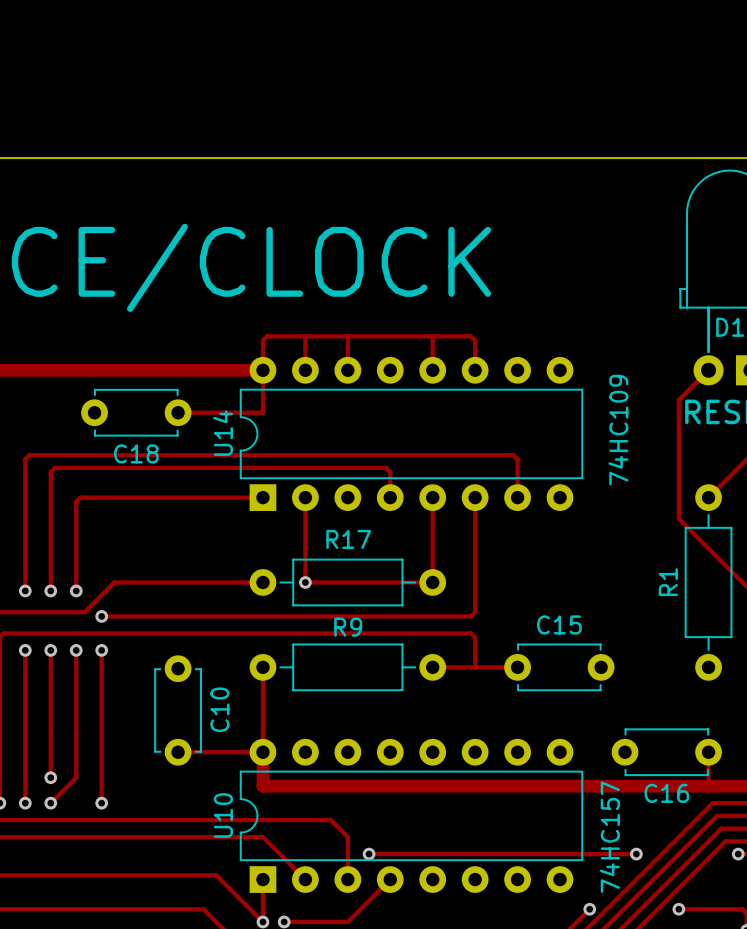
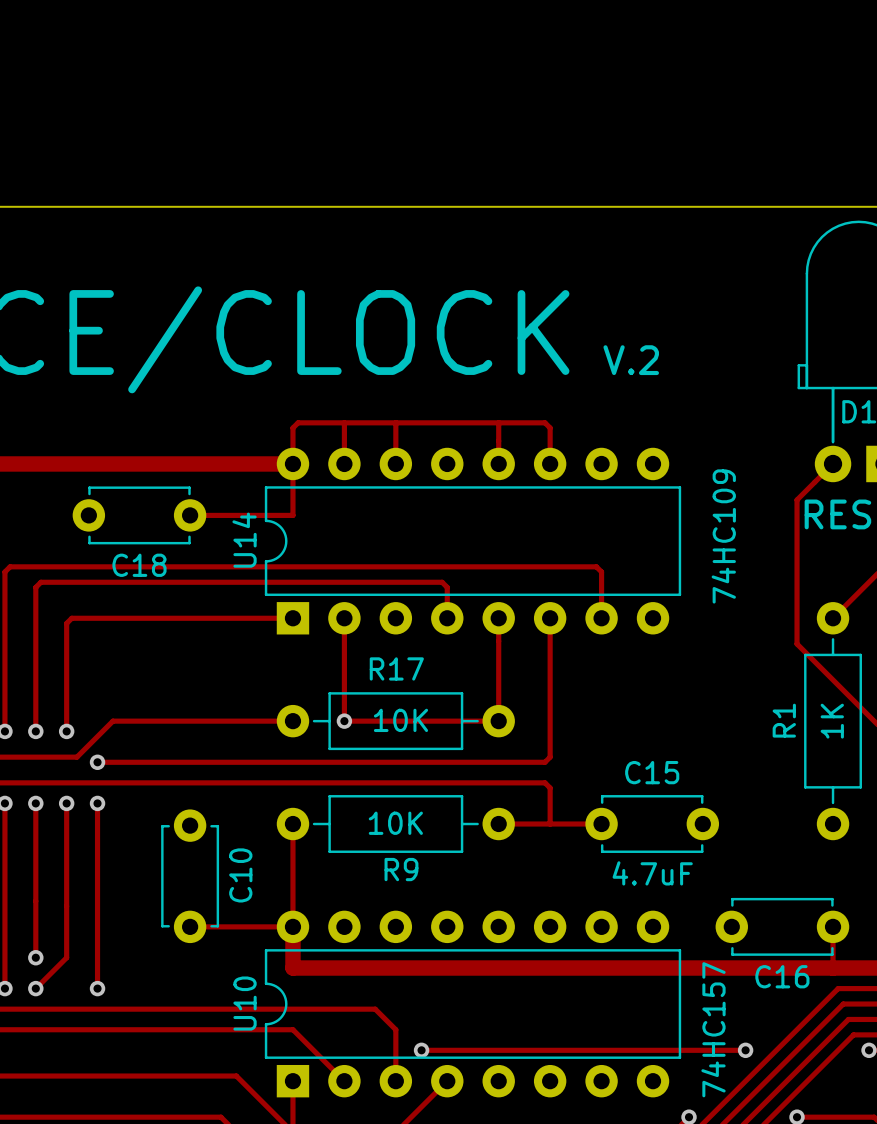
text: none -> V.2 (631, 360)
R17 value: none -> 10K (400, 720)
R1 value: none -> 1K (832, 721)
R9 name position: R9 (348, 627) -> R9 (401, 869)
R9 value: none -> 10K (395, 823)
C15 value: none -> 4.7uF (652, 873)

